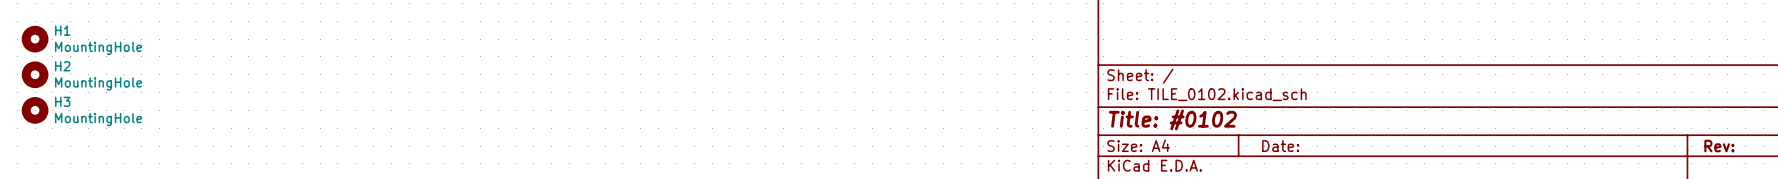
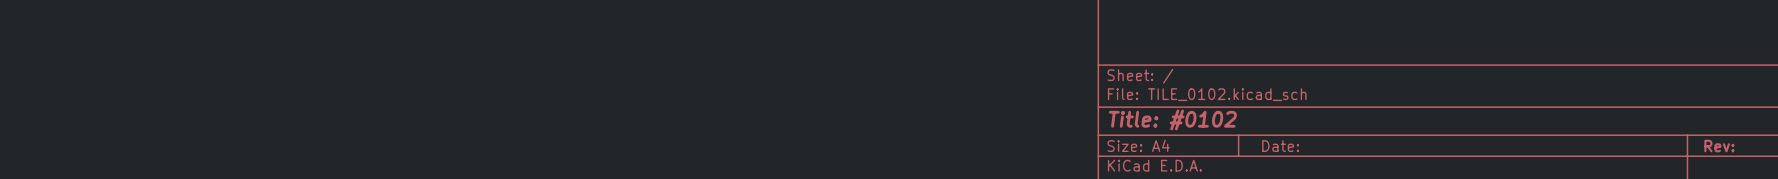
H1: MountingHole (35, 39) -> none
H2: MountingHole (35, 74) -> none
H3: MountingHole (35, 110) -> none

